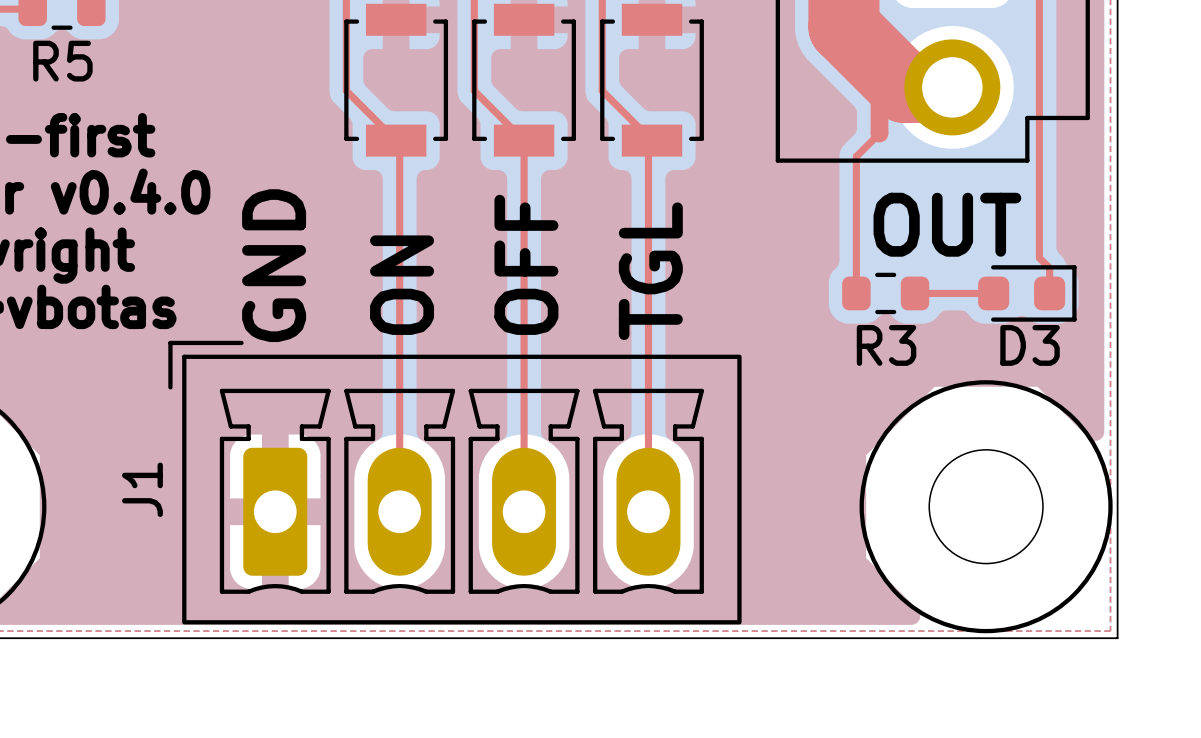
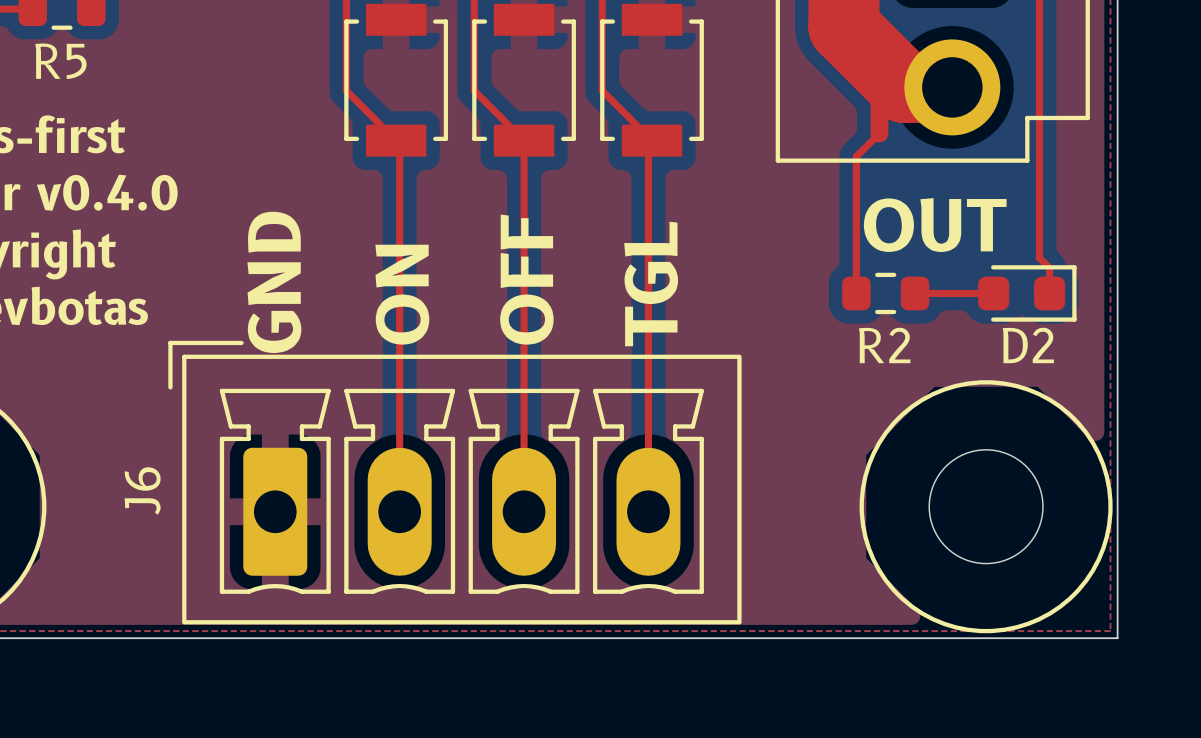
R3 name: R3 (886, 345) -> R2 (884, 345)
D3 name: D3 (1030, 345) -> D2 (1028, 345)
J1 name: J1 (142, 489) -> J6 (142, 490)

